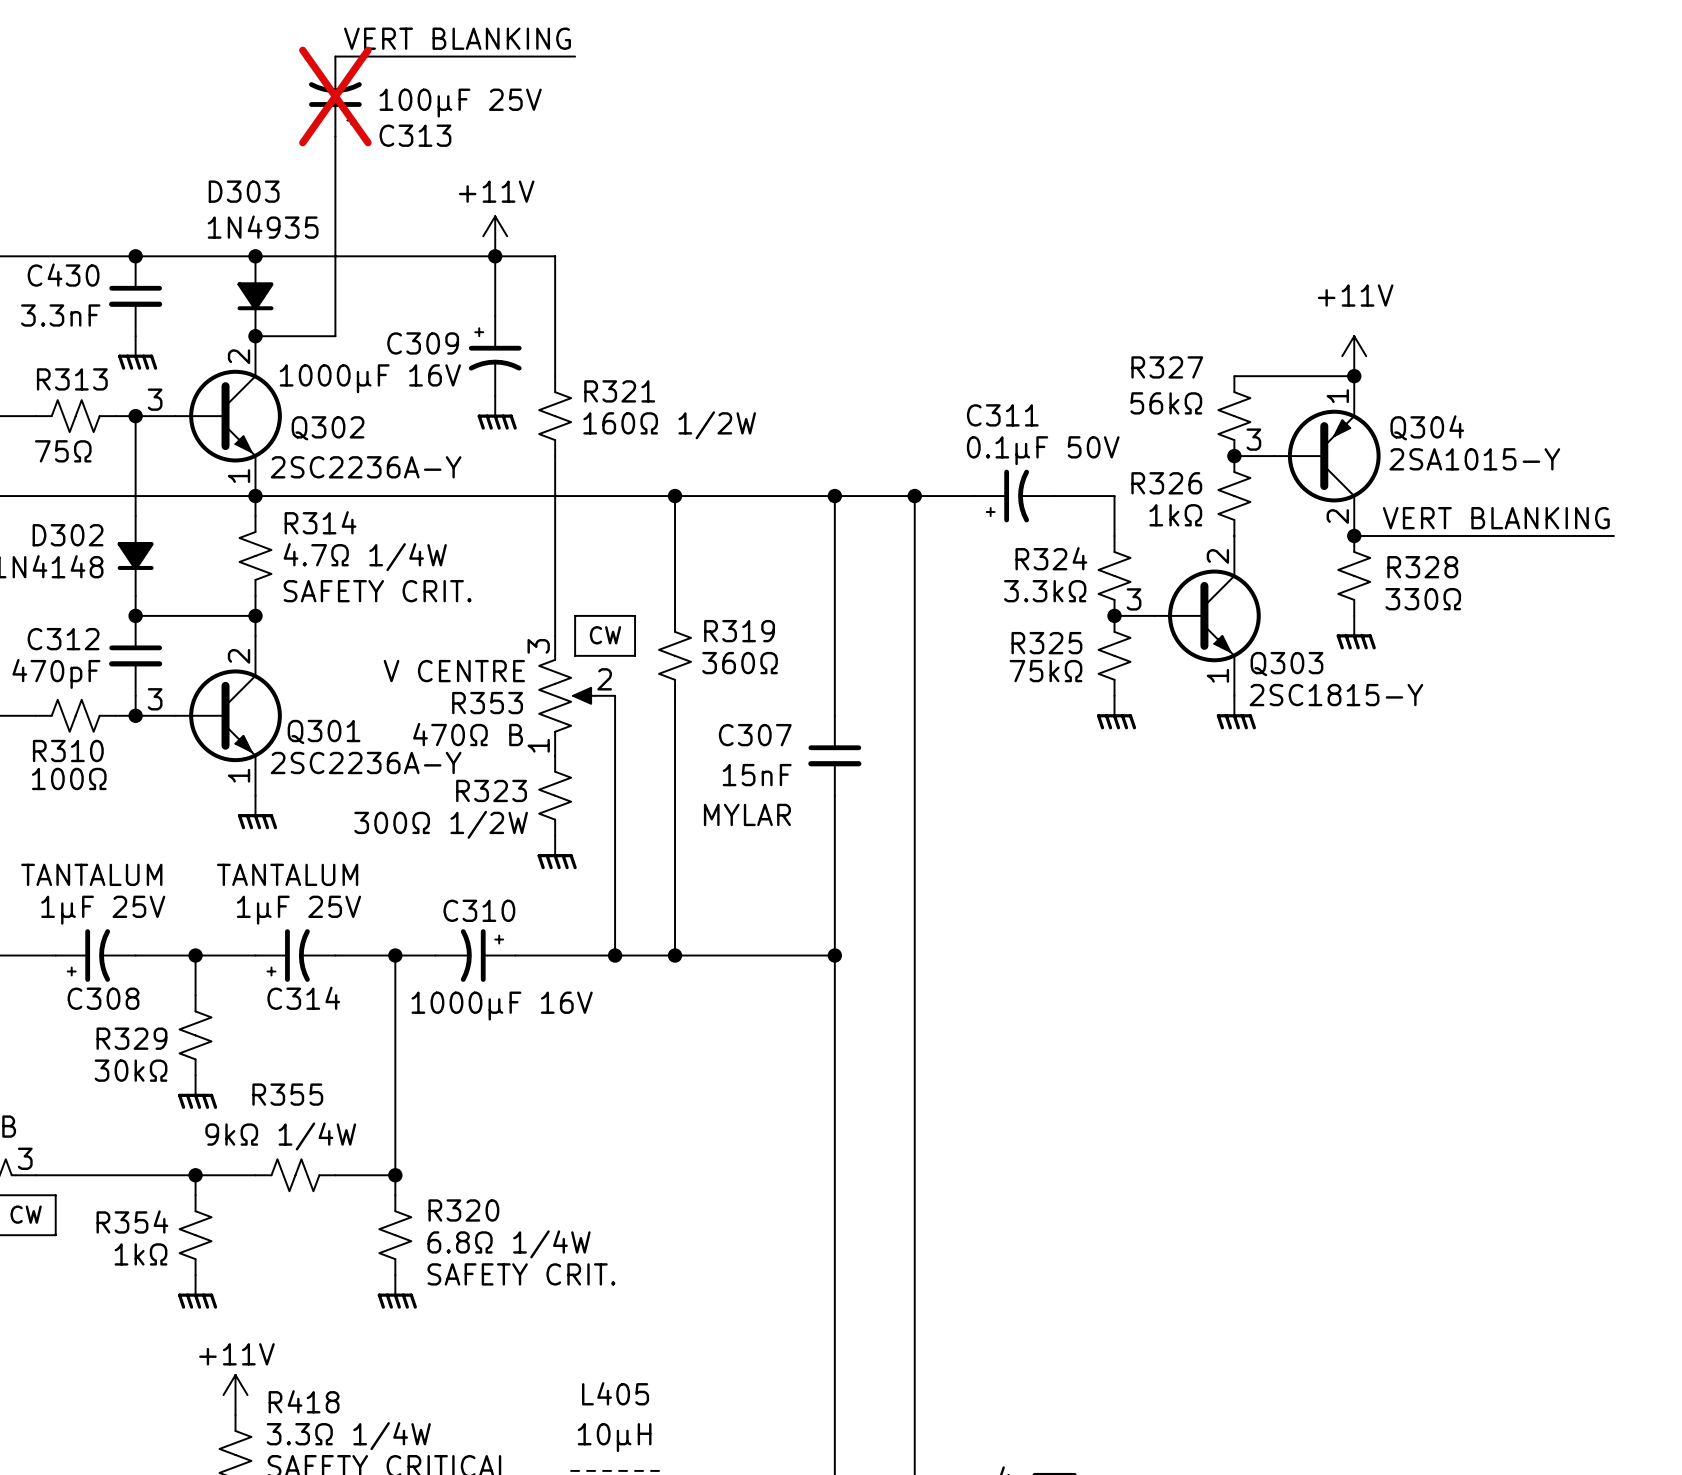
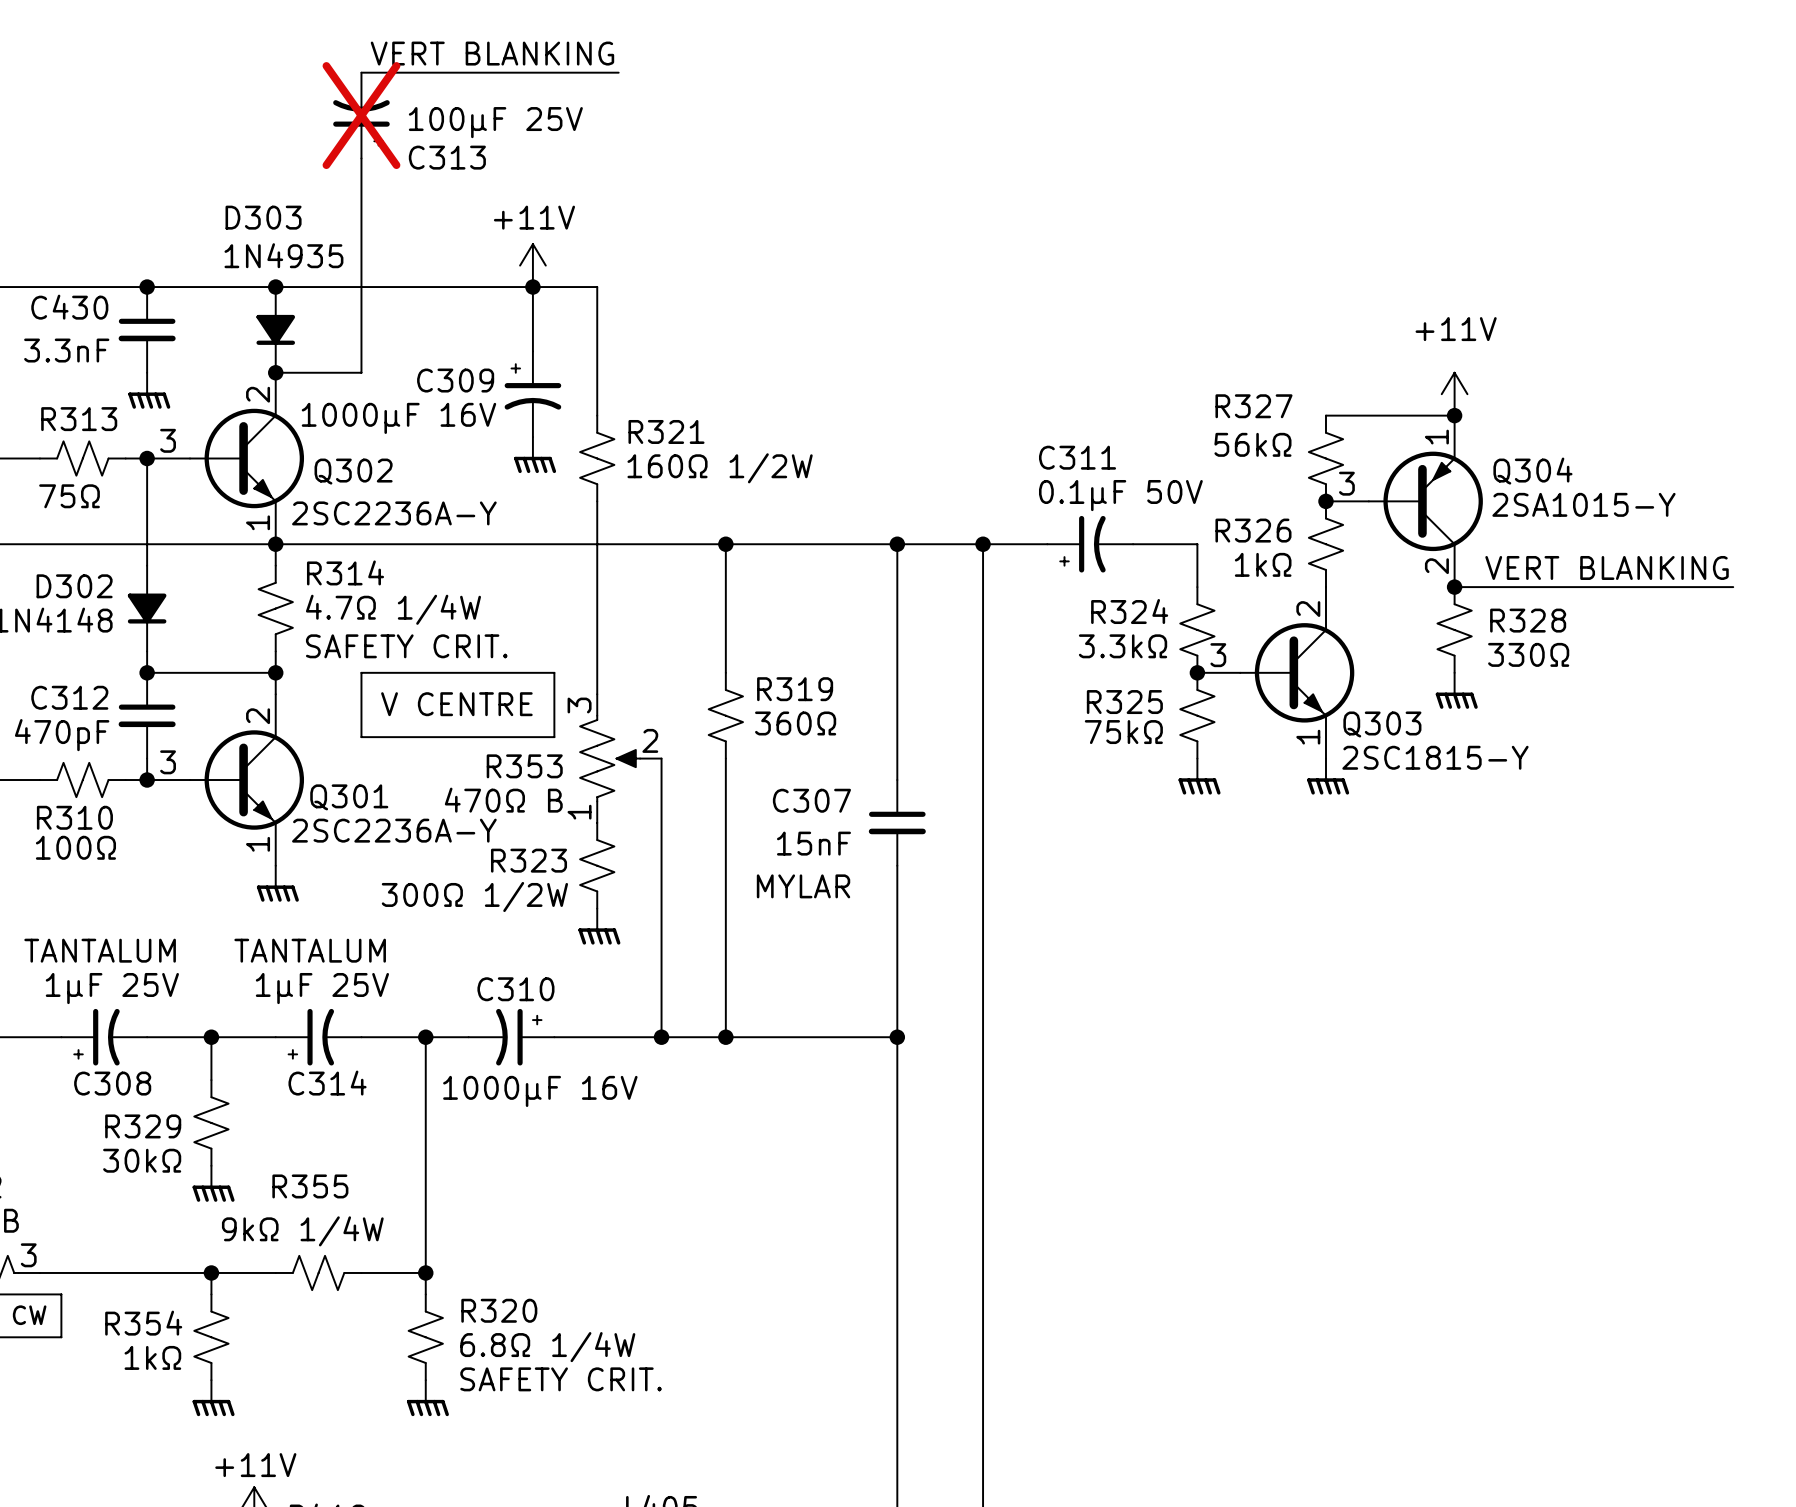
line: none -> (361, 672) (554, 672) (554, 737) (361, 737) (361, 672)
line: (575, 615) (635, 615) (635, 655) (575, 655) (575, 615) -> none
text: CW (605, 635) -> none
text: none -> V CENTRE (456, 704)
R353 text: V CENTRE (454, 671) -> none

